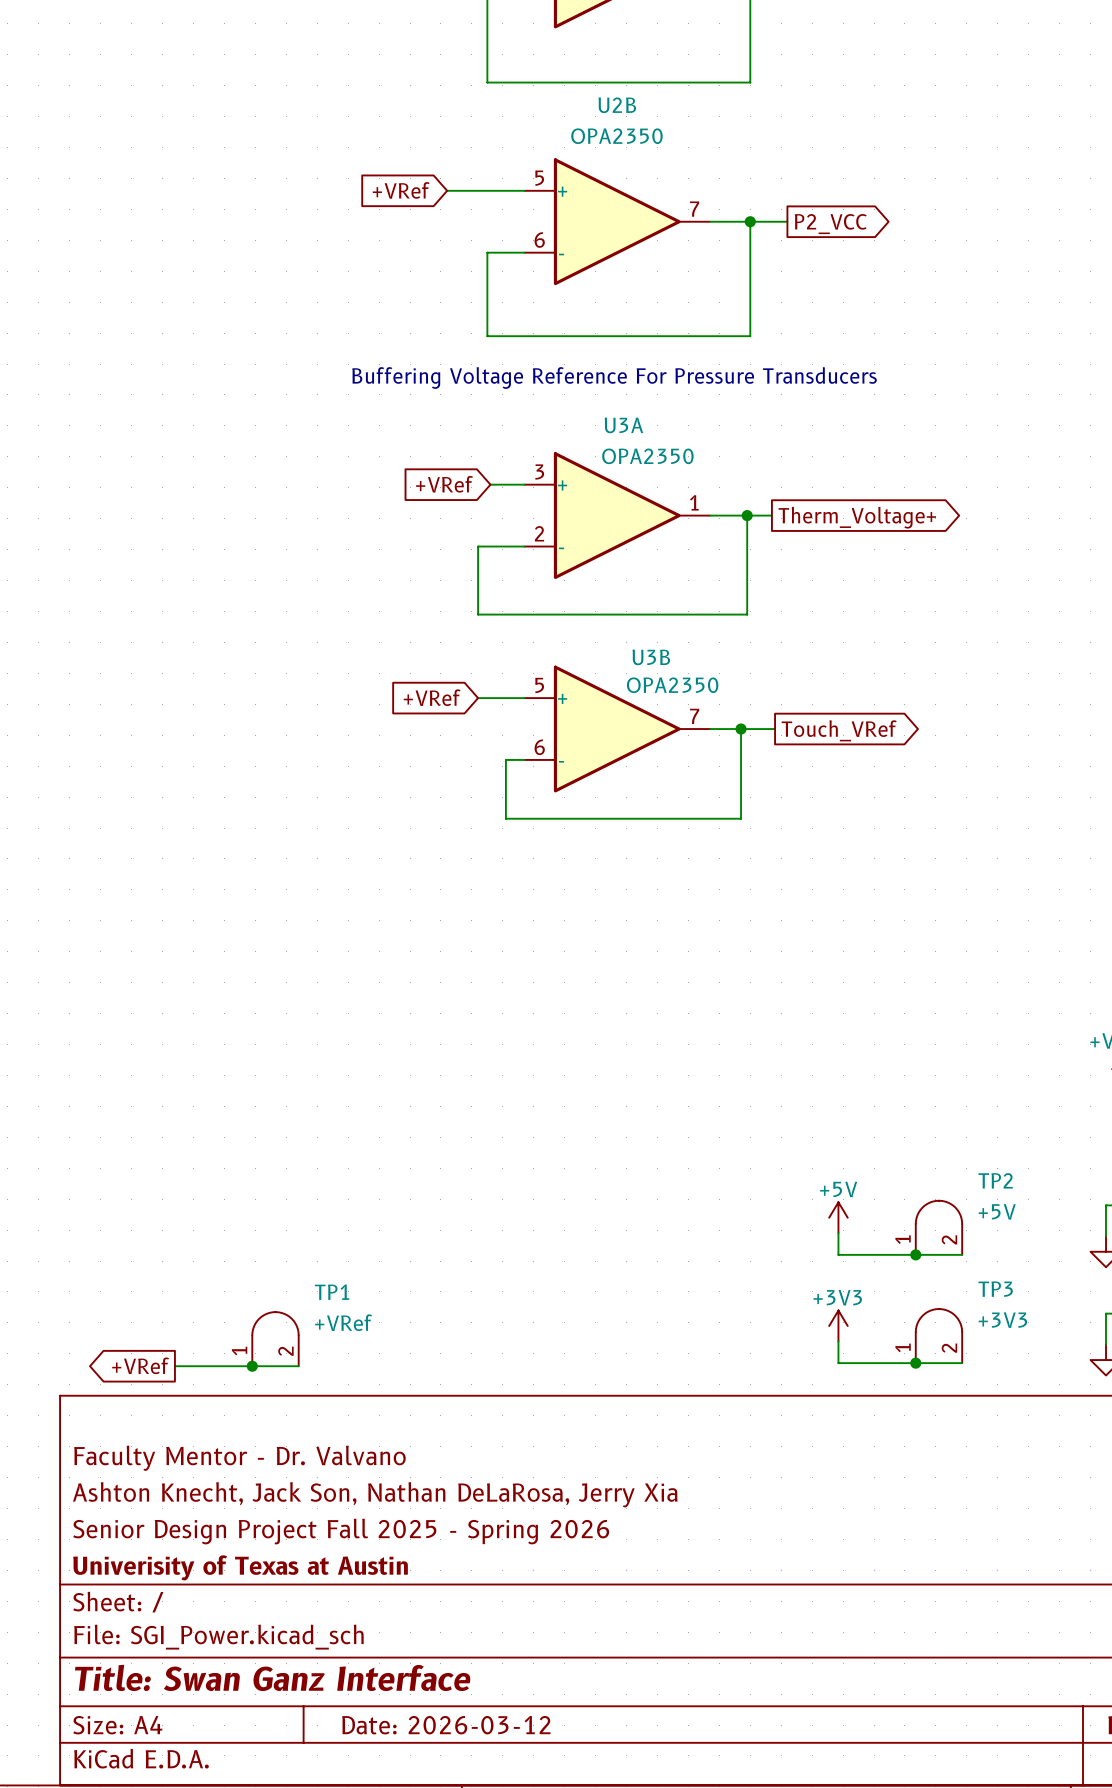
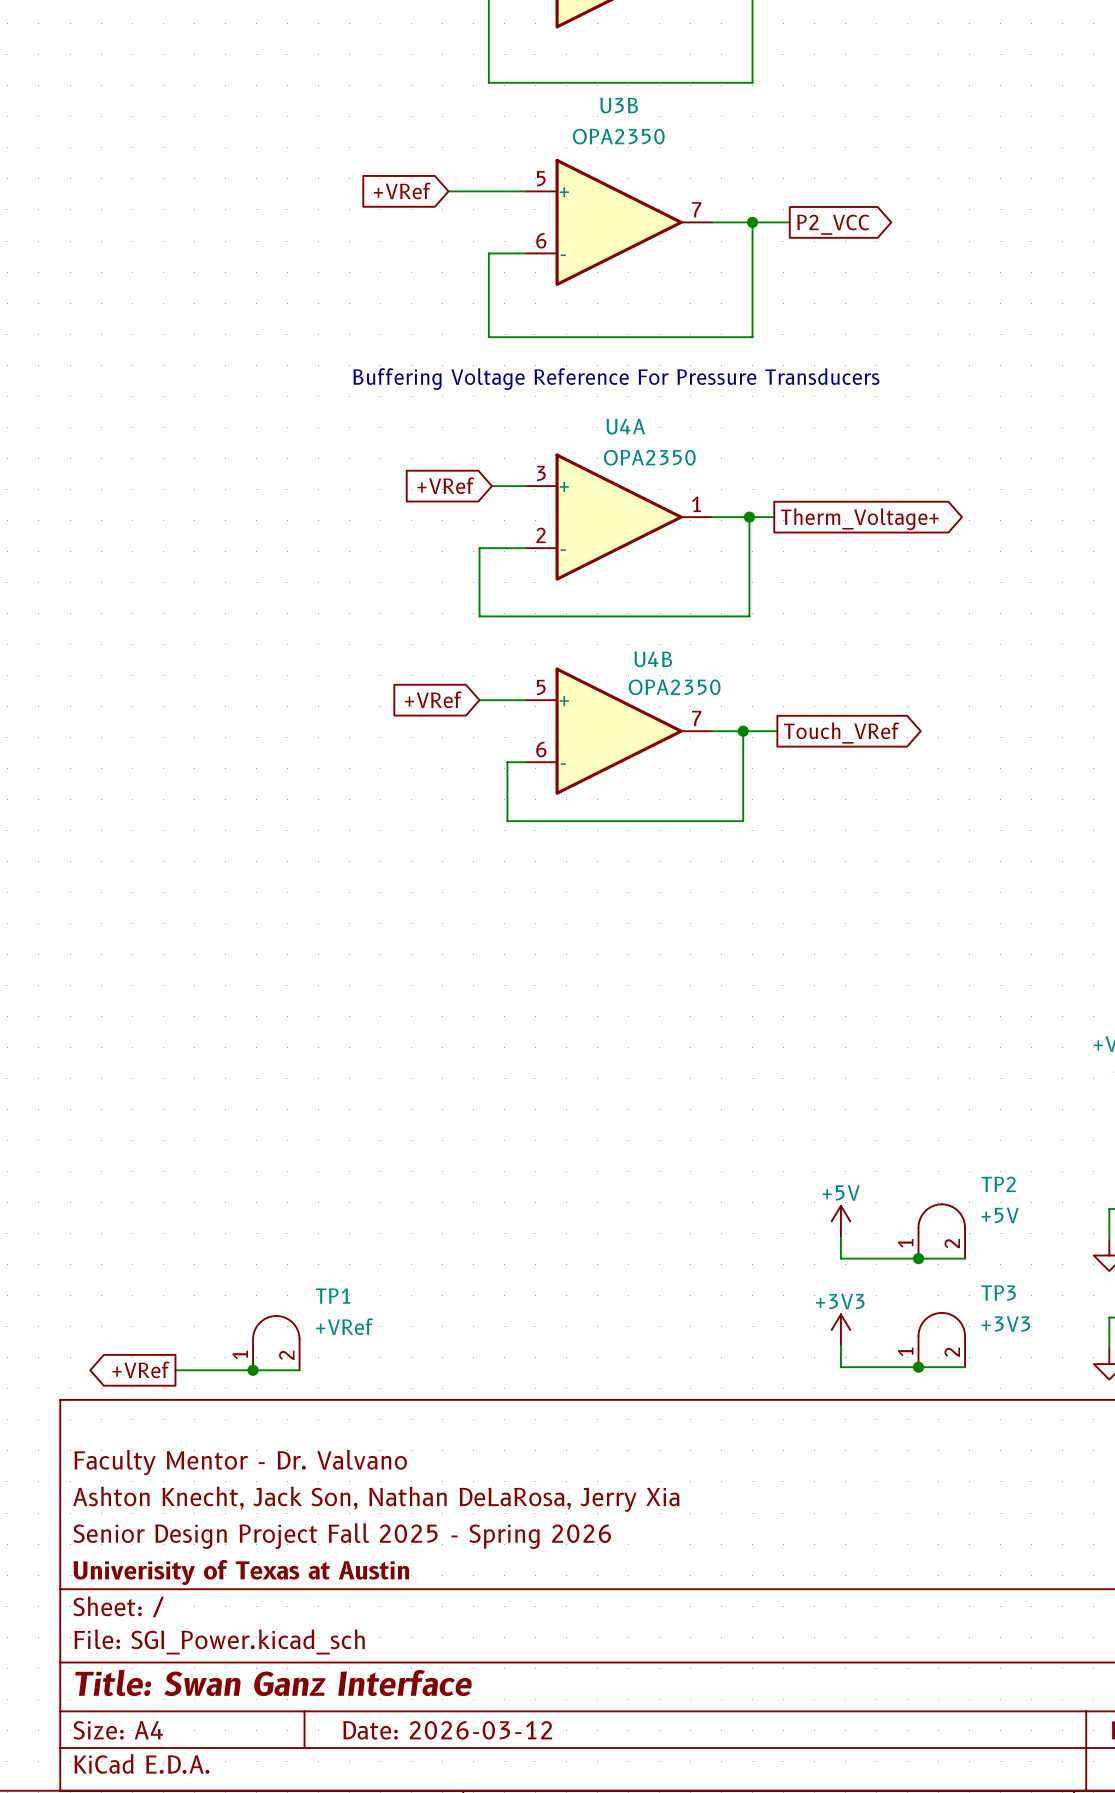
U2B name: U2B (617, 105) -> U3B (619, 105)
U3A name: U3A (623, 425) -> U4A (625, 426)
U3B name: U3B (651, 657) -> U4B (653, 659)

